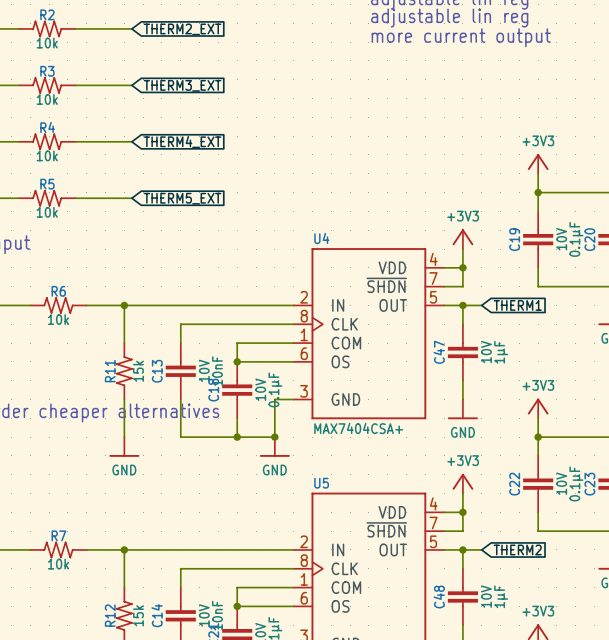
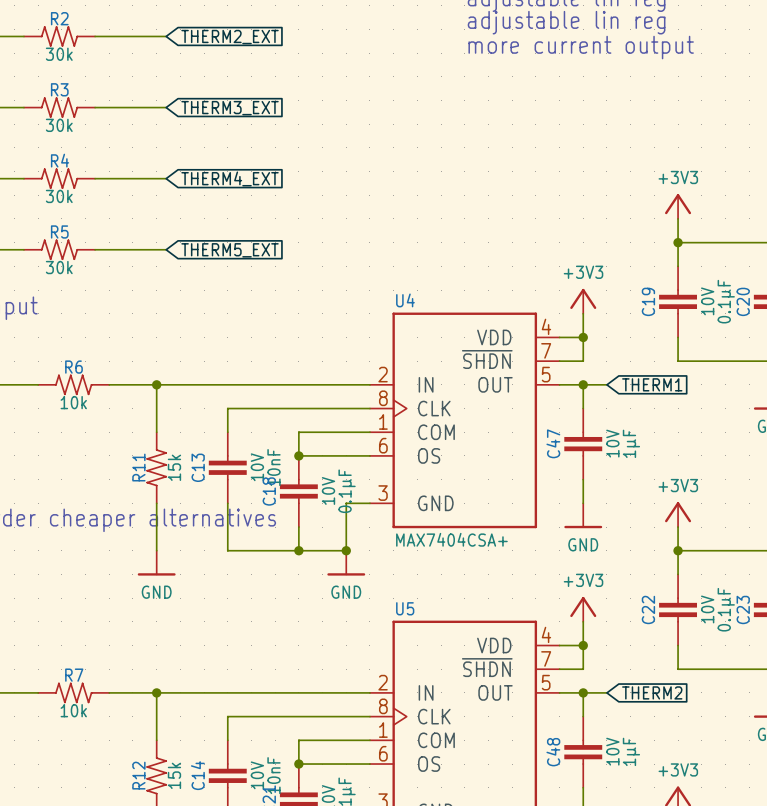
R2 text: 10k (47, 43) -> 30k (59, 54)
R3 text: 10k (47, 99) -> 30k (59, 125)
R4 text: 10k (47, 155) -> 30k (59, 196)
R5 text: 10k (47, 212) -> 30k (59, 267)

